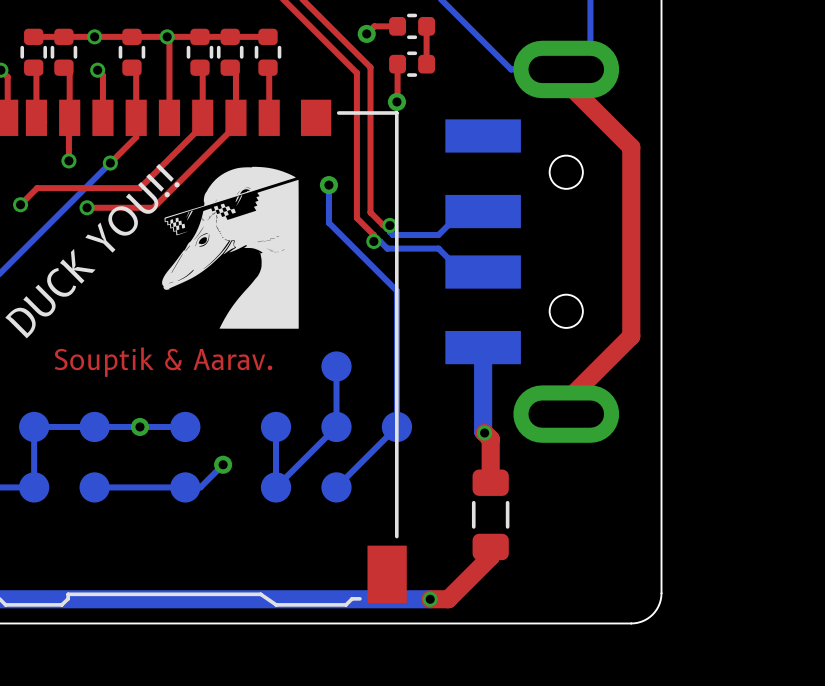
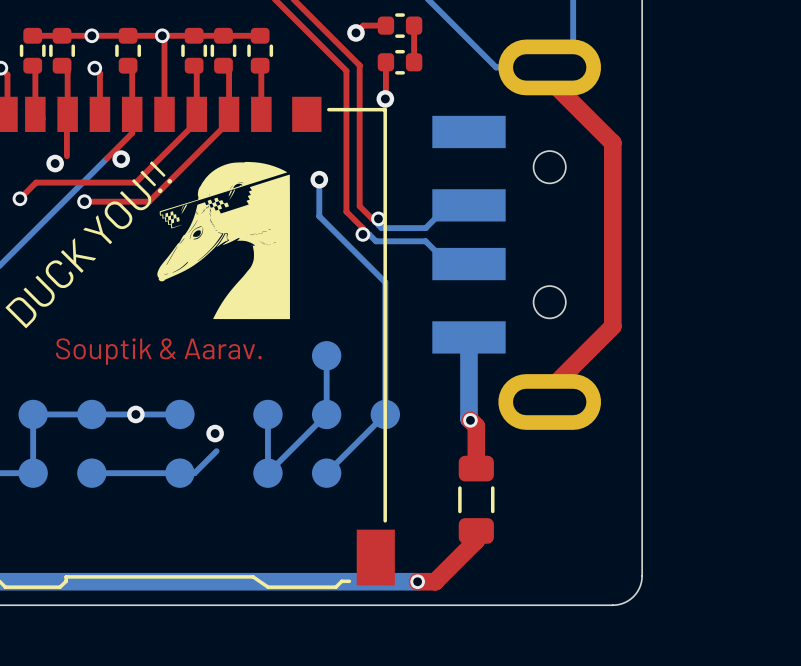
via position: (68, 160) -> (55, 163)
via position: (110, 163) -> (121, 159)
via position: (223, 464) -> (215, 433)

